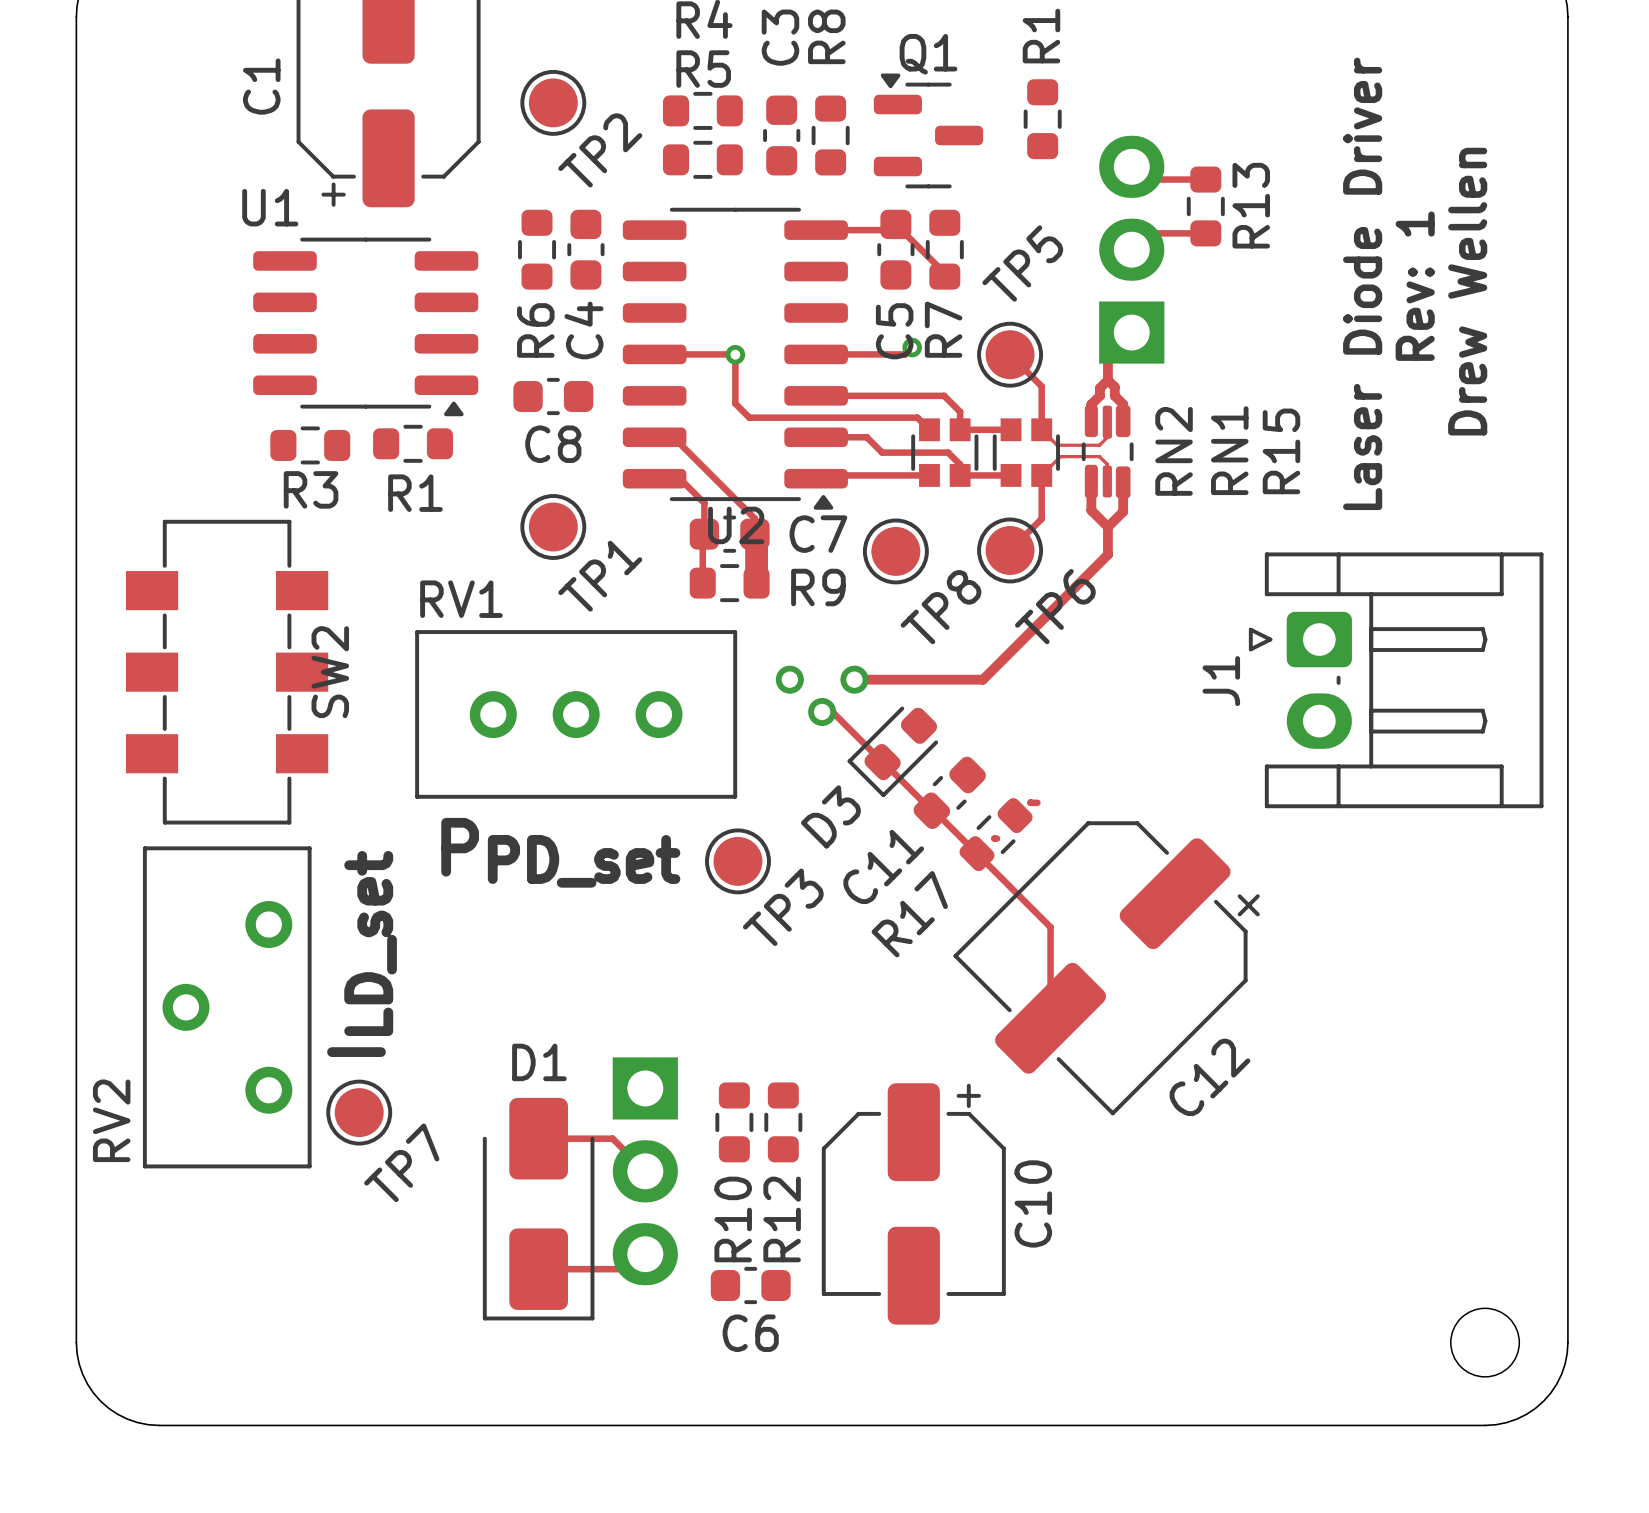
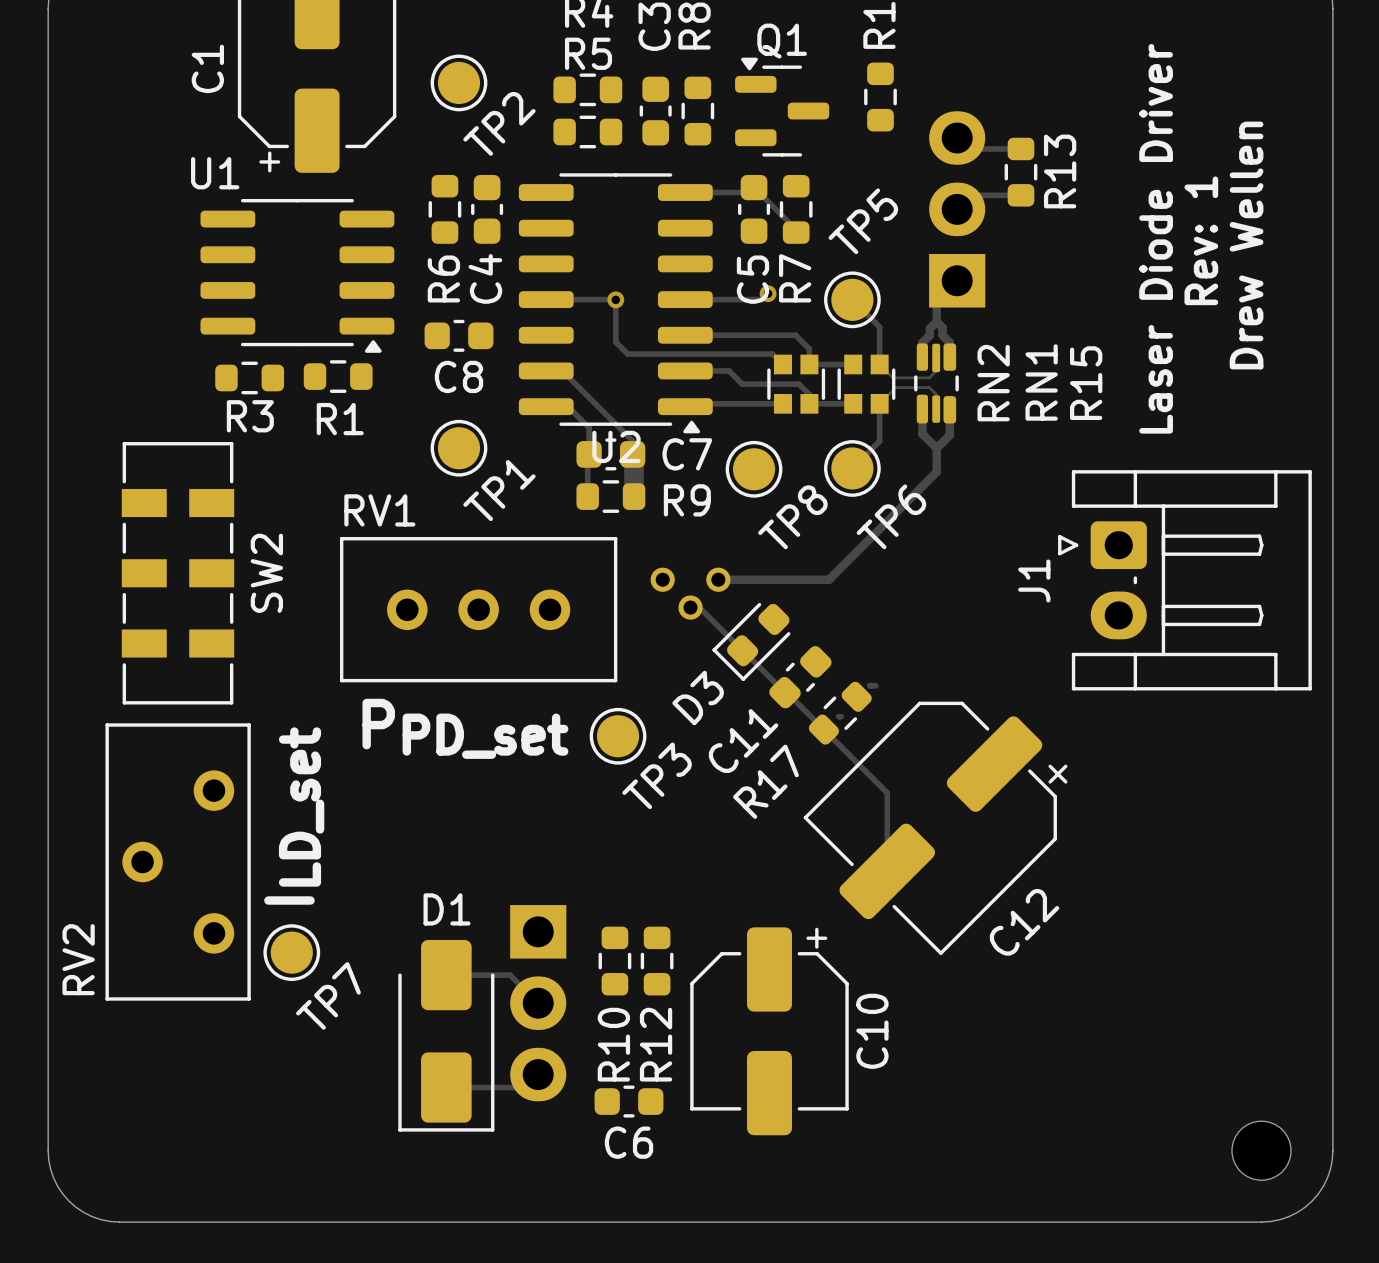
SW2 footprint: [125, 519, 329, 825] -> [121, 442, 235, 705]

